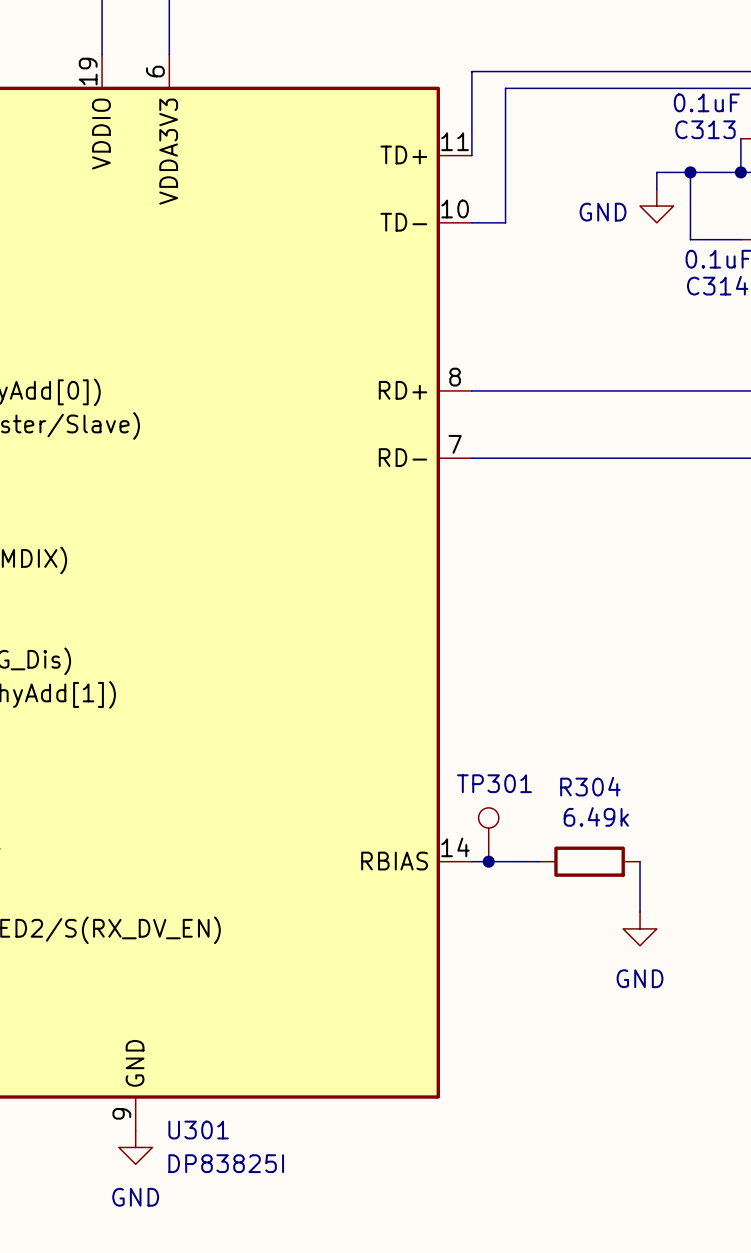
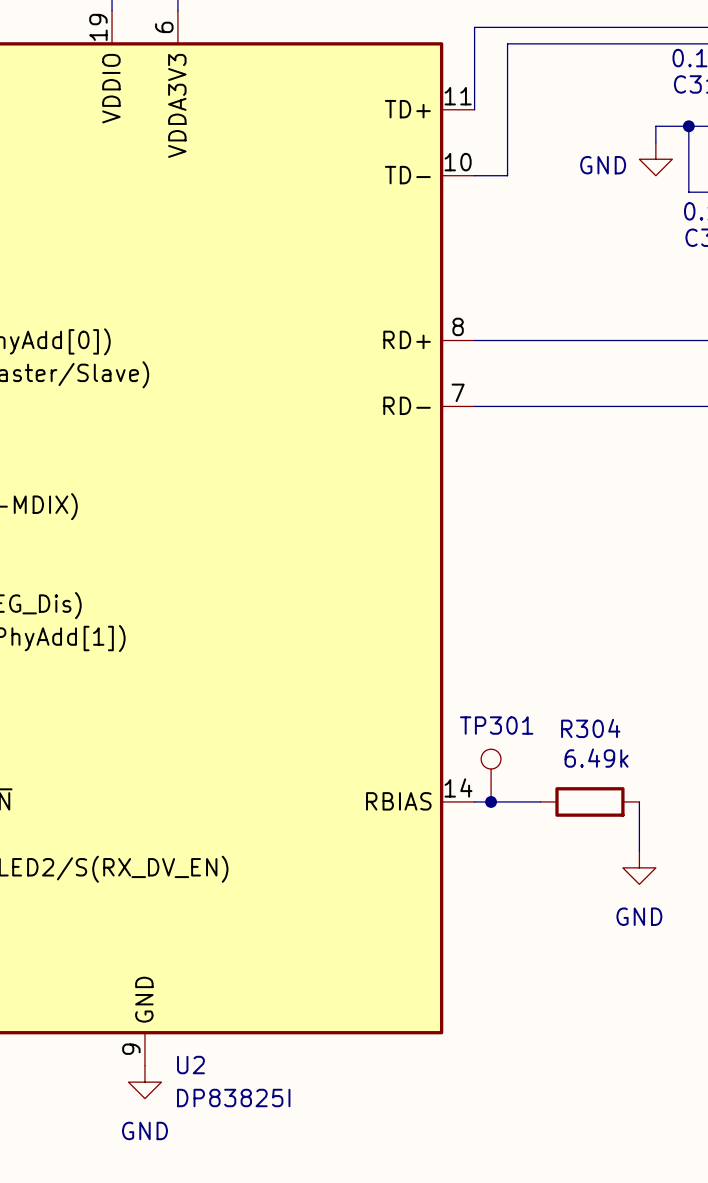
U301 name: U301 (198, 1130) -> U2 (190, 1065)

